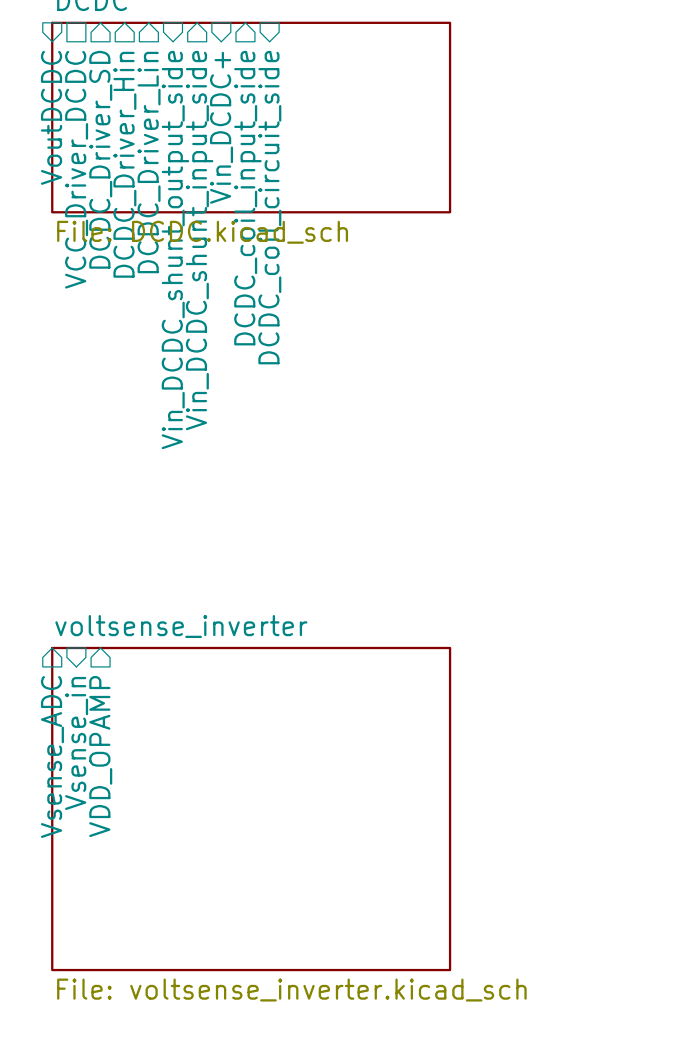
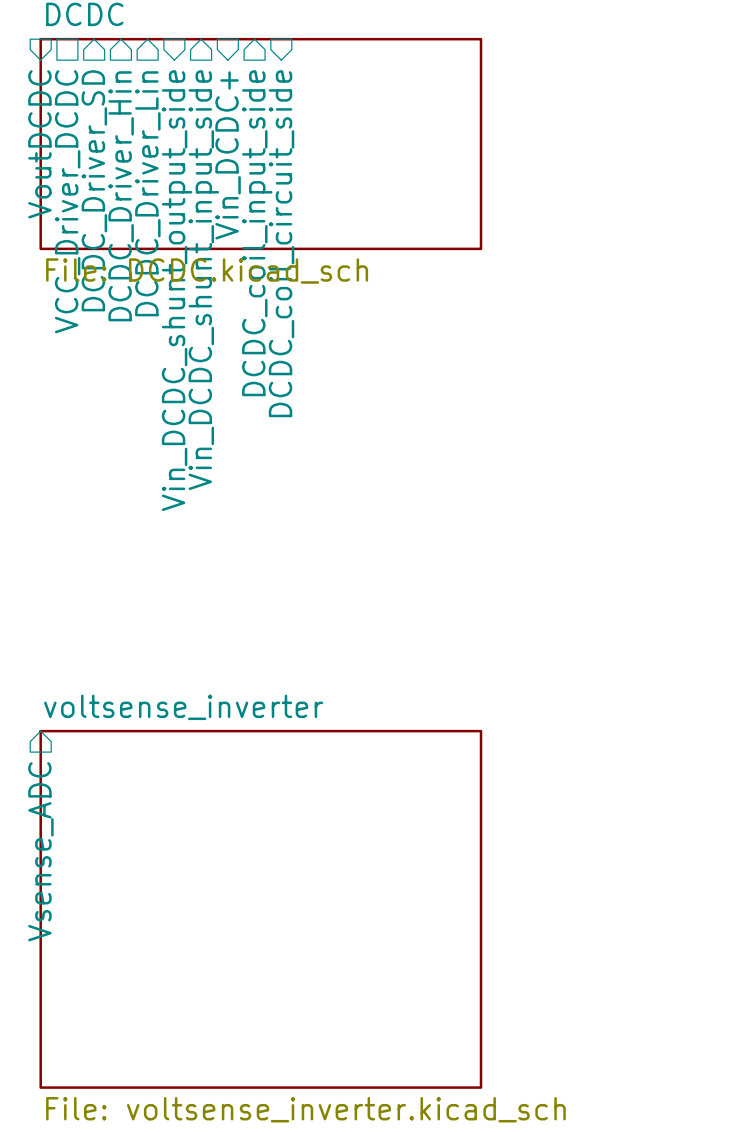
sheet pin: Vsense_in (76, 743) -> none
sheet pin: VDD_OPAMP (100, 756) -> none

